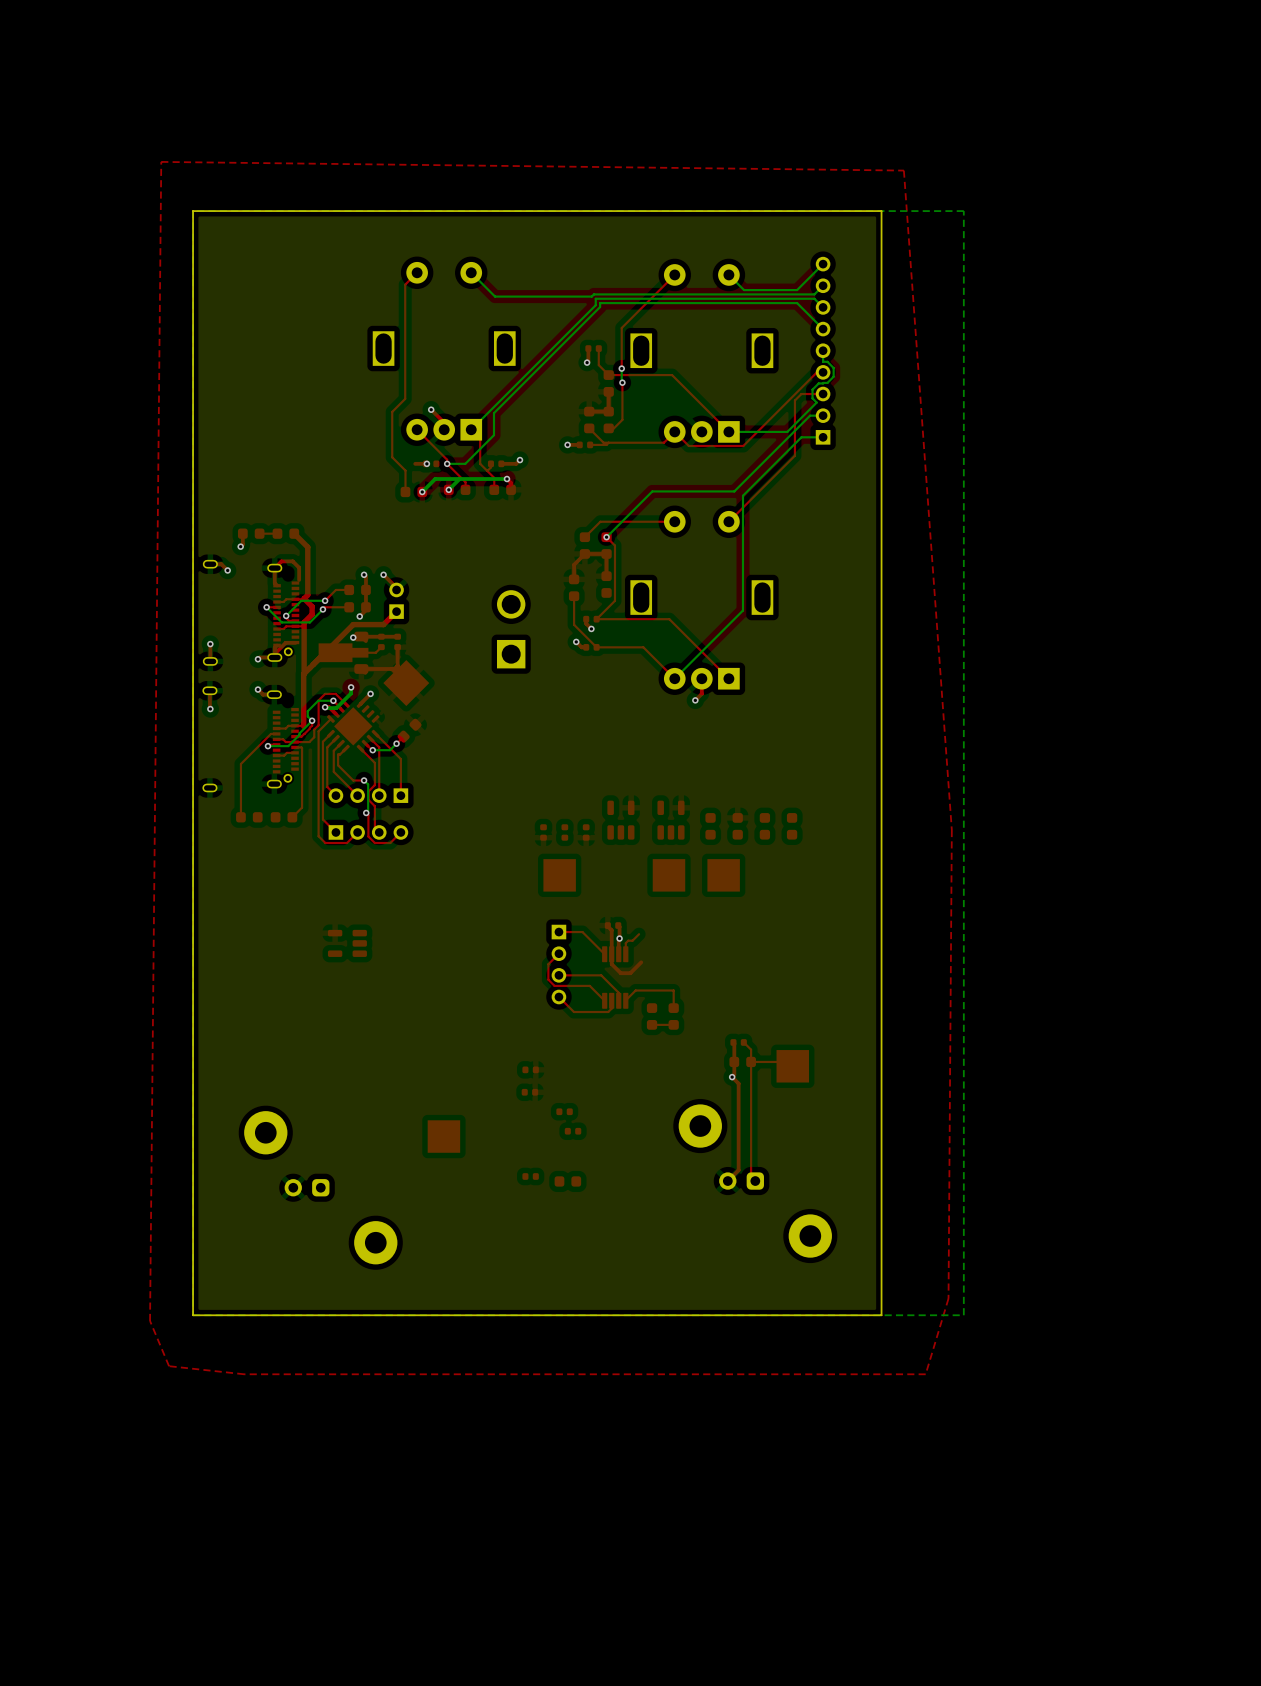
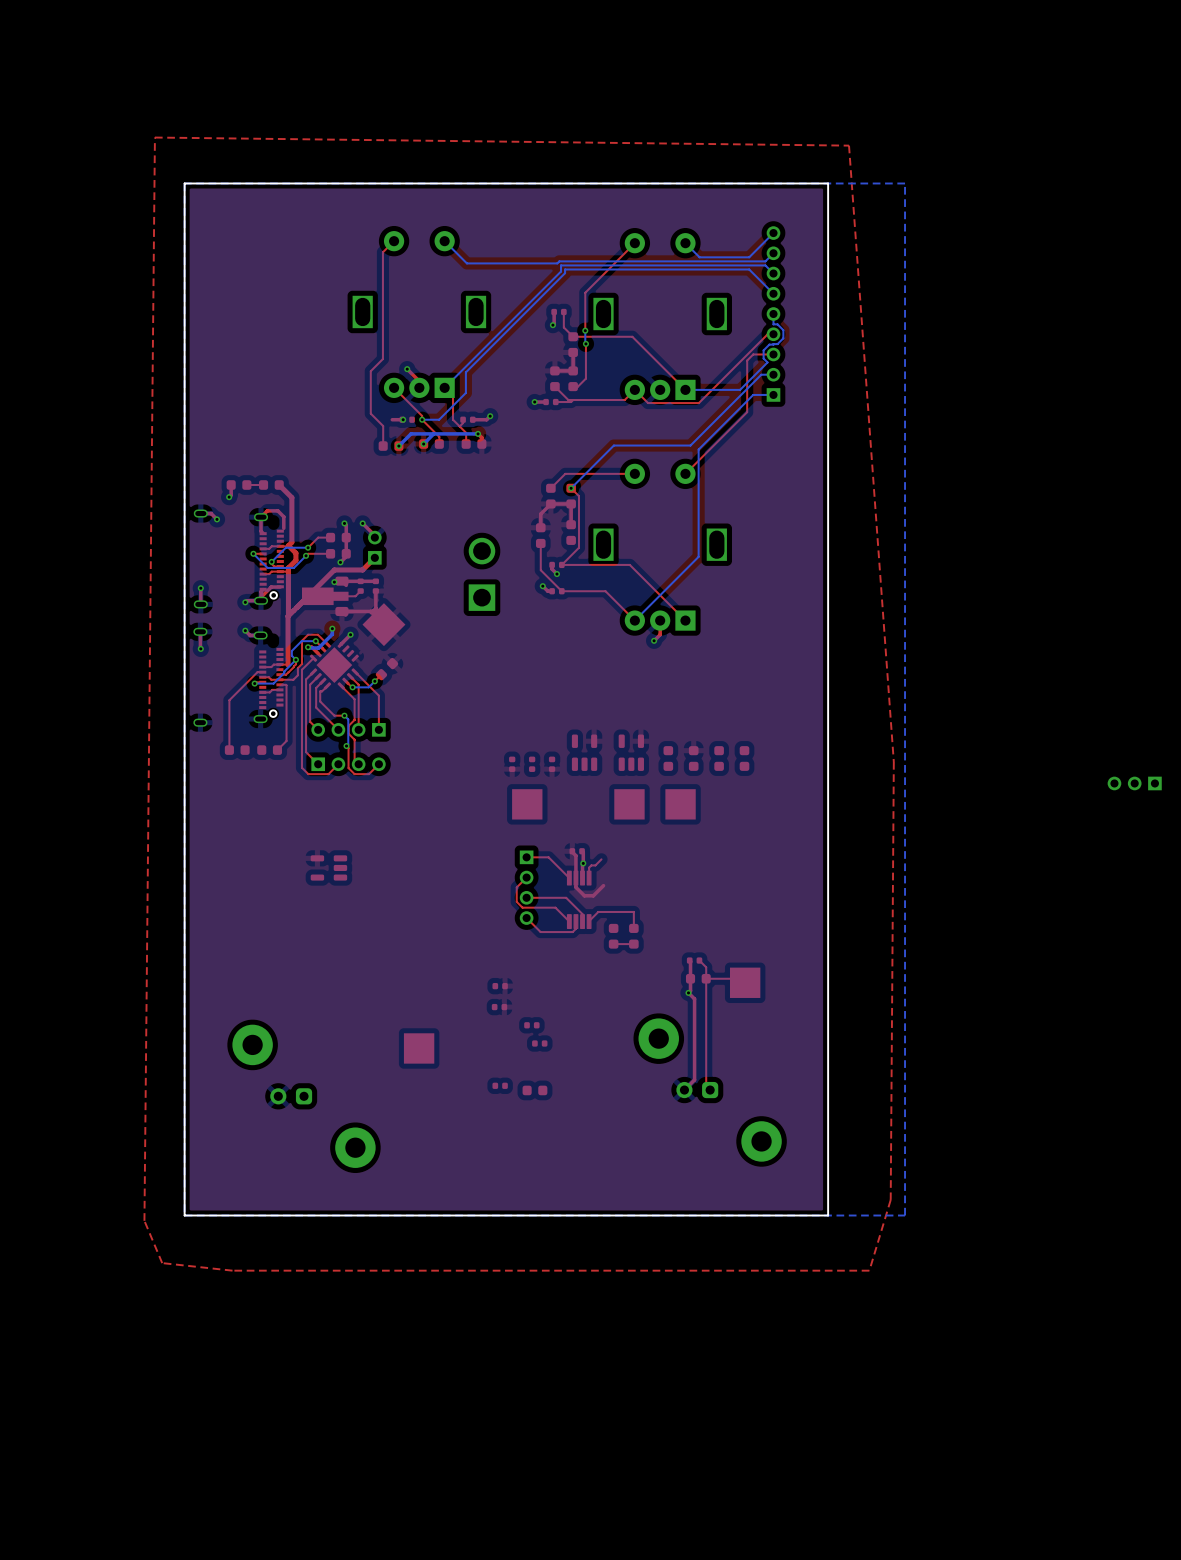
part: none -> (1134, 783)

